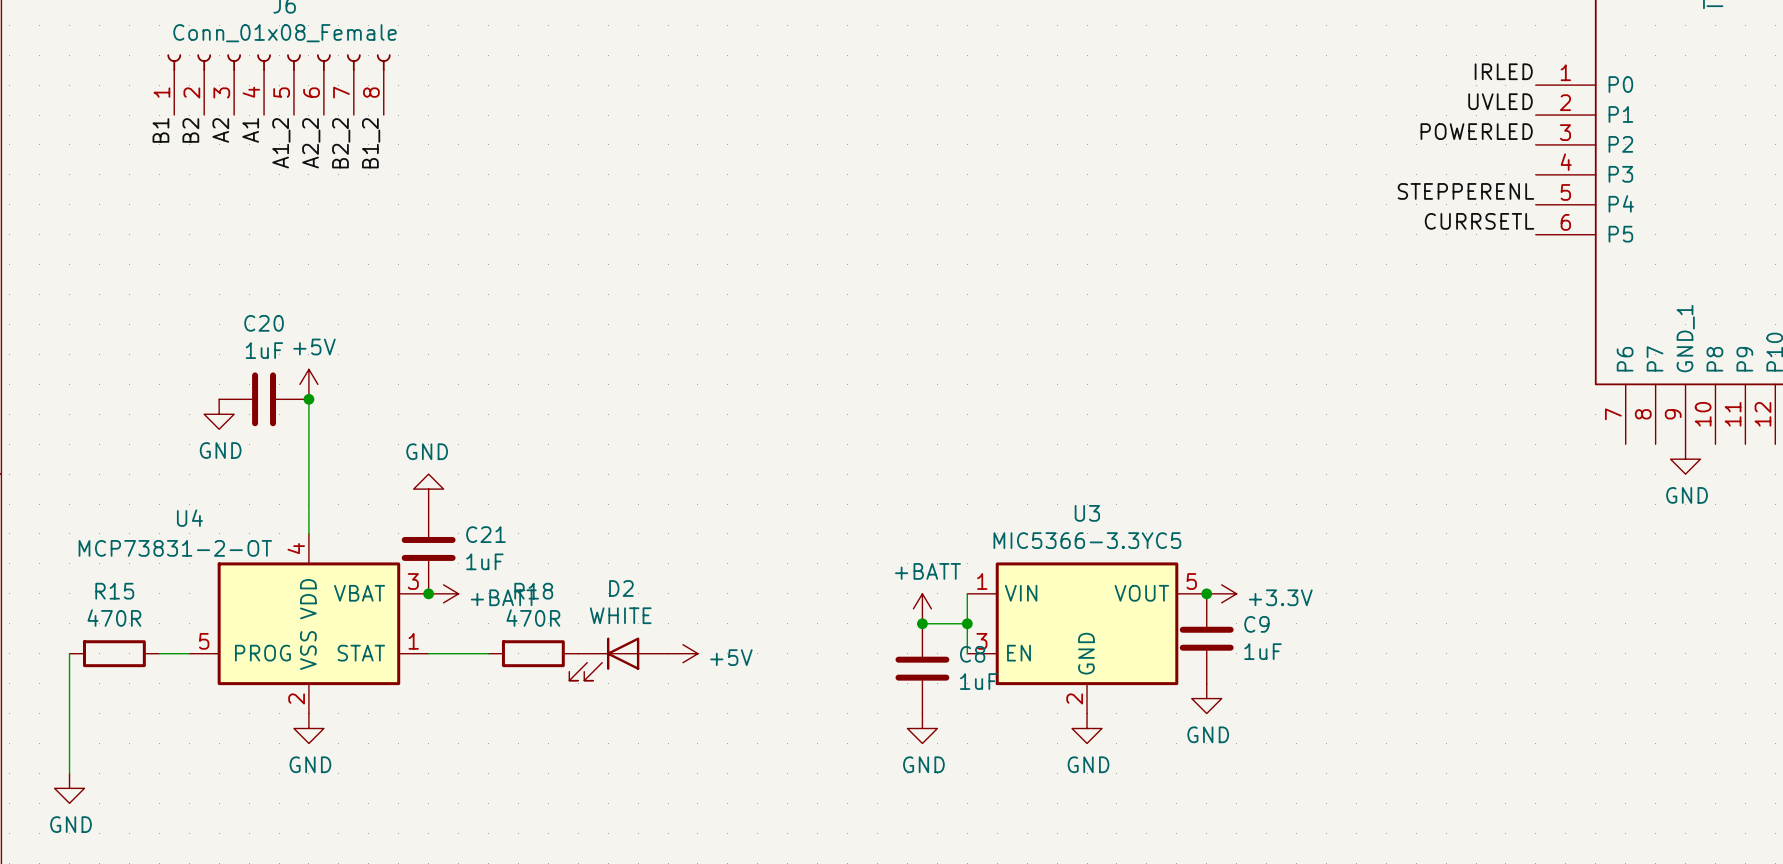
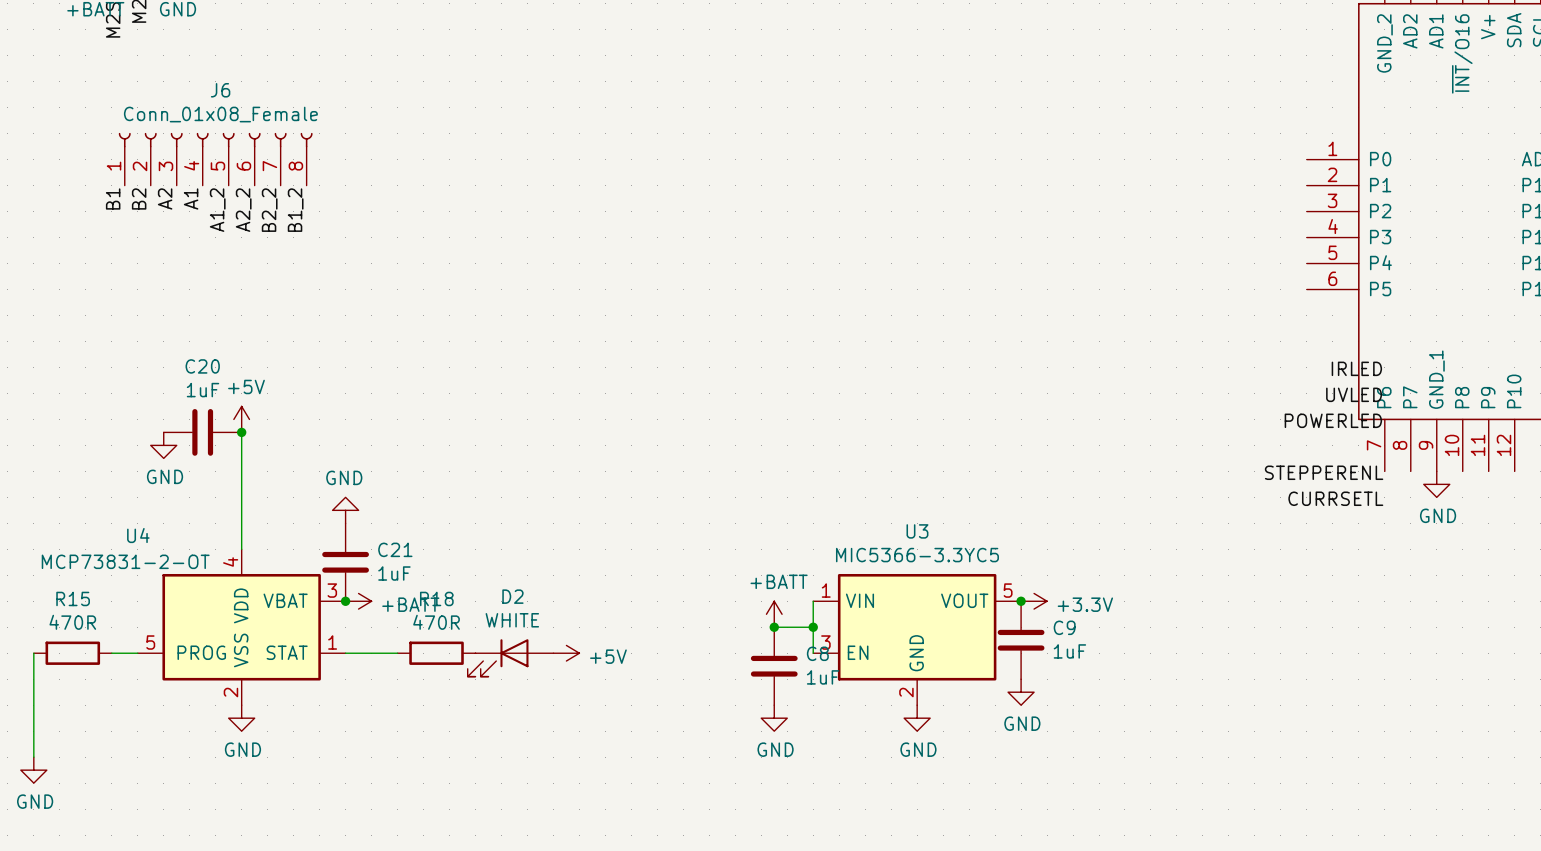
label position: IRLED (1503, 71) -> IRLED (1356, 368)
label position: UVLED (1500, 101) -> UVLED (1354, 394)
label position: POWERLED (1476, 131) -> POWERLED (1333, 420)
label position: STEPPERENL (1465, 191) -> STEPPERENL (1324, 472)
label position: CURRSETL (1479, 221) -> CURRSETL (1335, 498)

